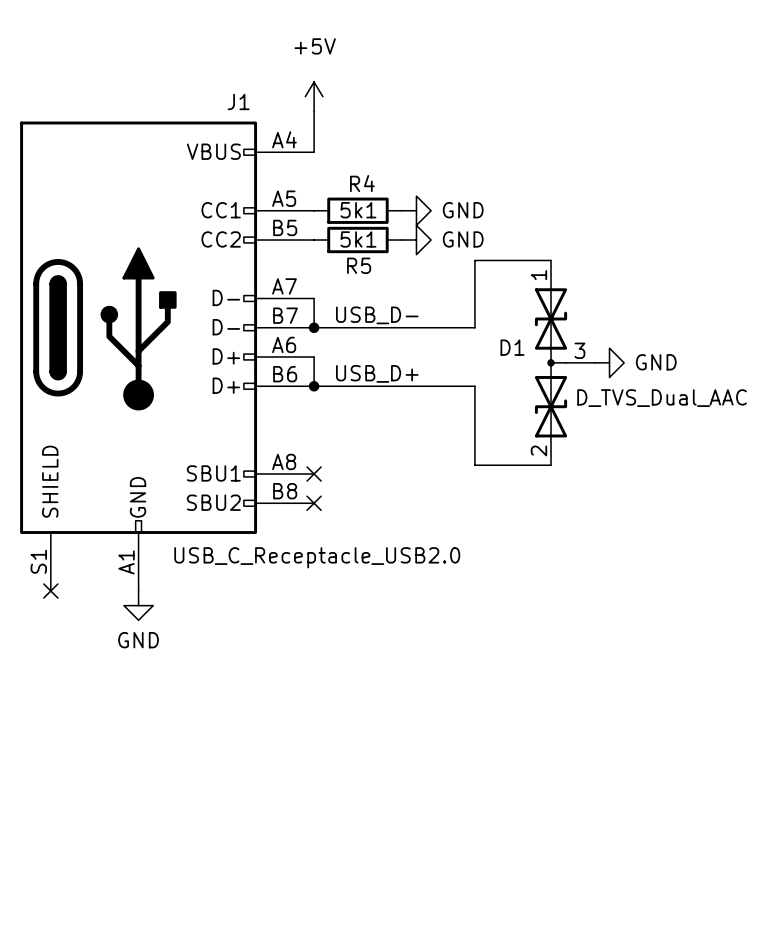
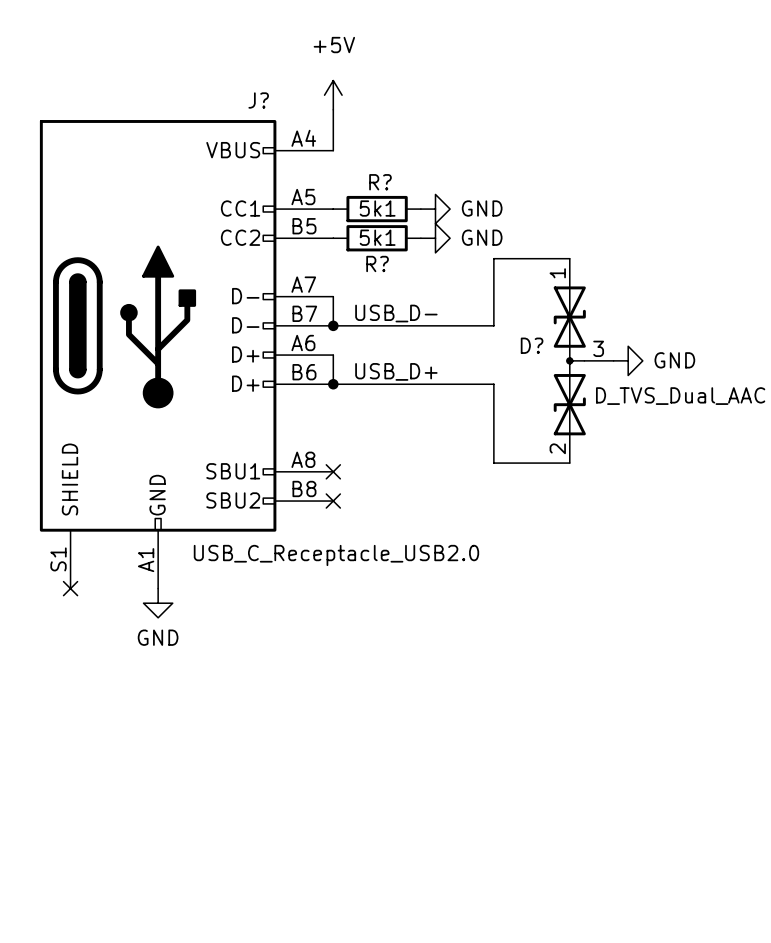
J1 name: J1 (238, 101) -> J? (258, 100)
R4 name: R4 (362, 183) -> R? (380, 182)
R5 name: R5 (359, 265) -> R? (377, 263)
D1 name: D1 (512, 347) -> D? (532, 345)

